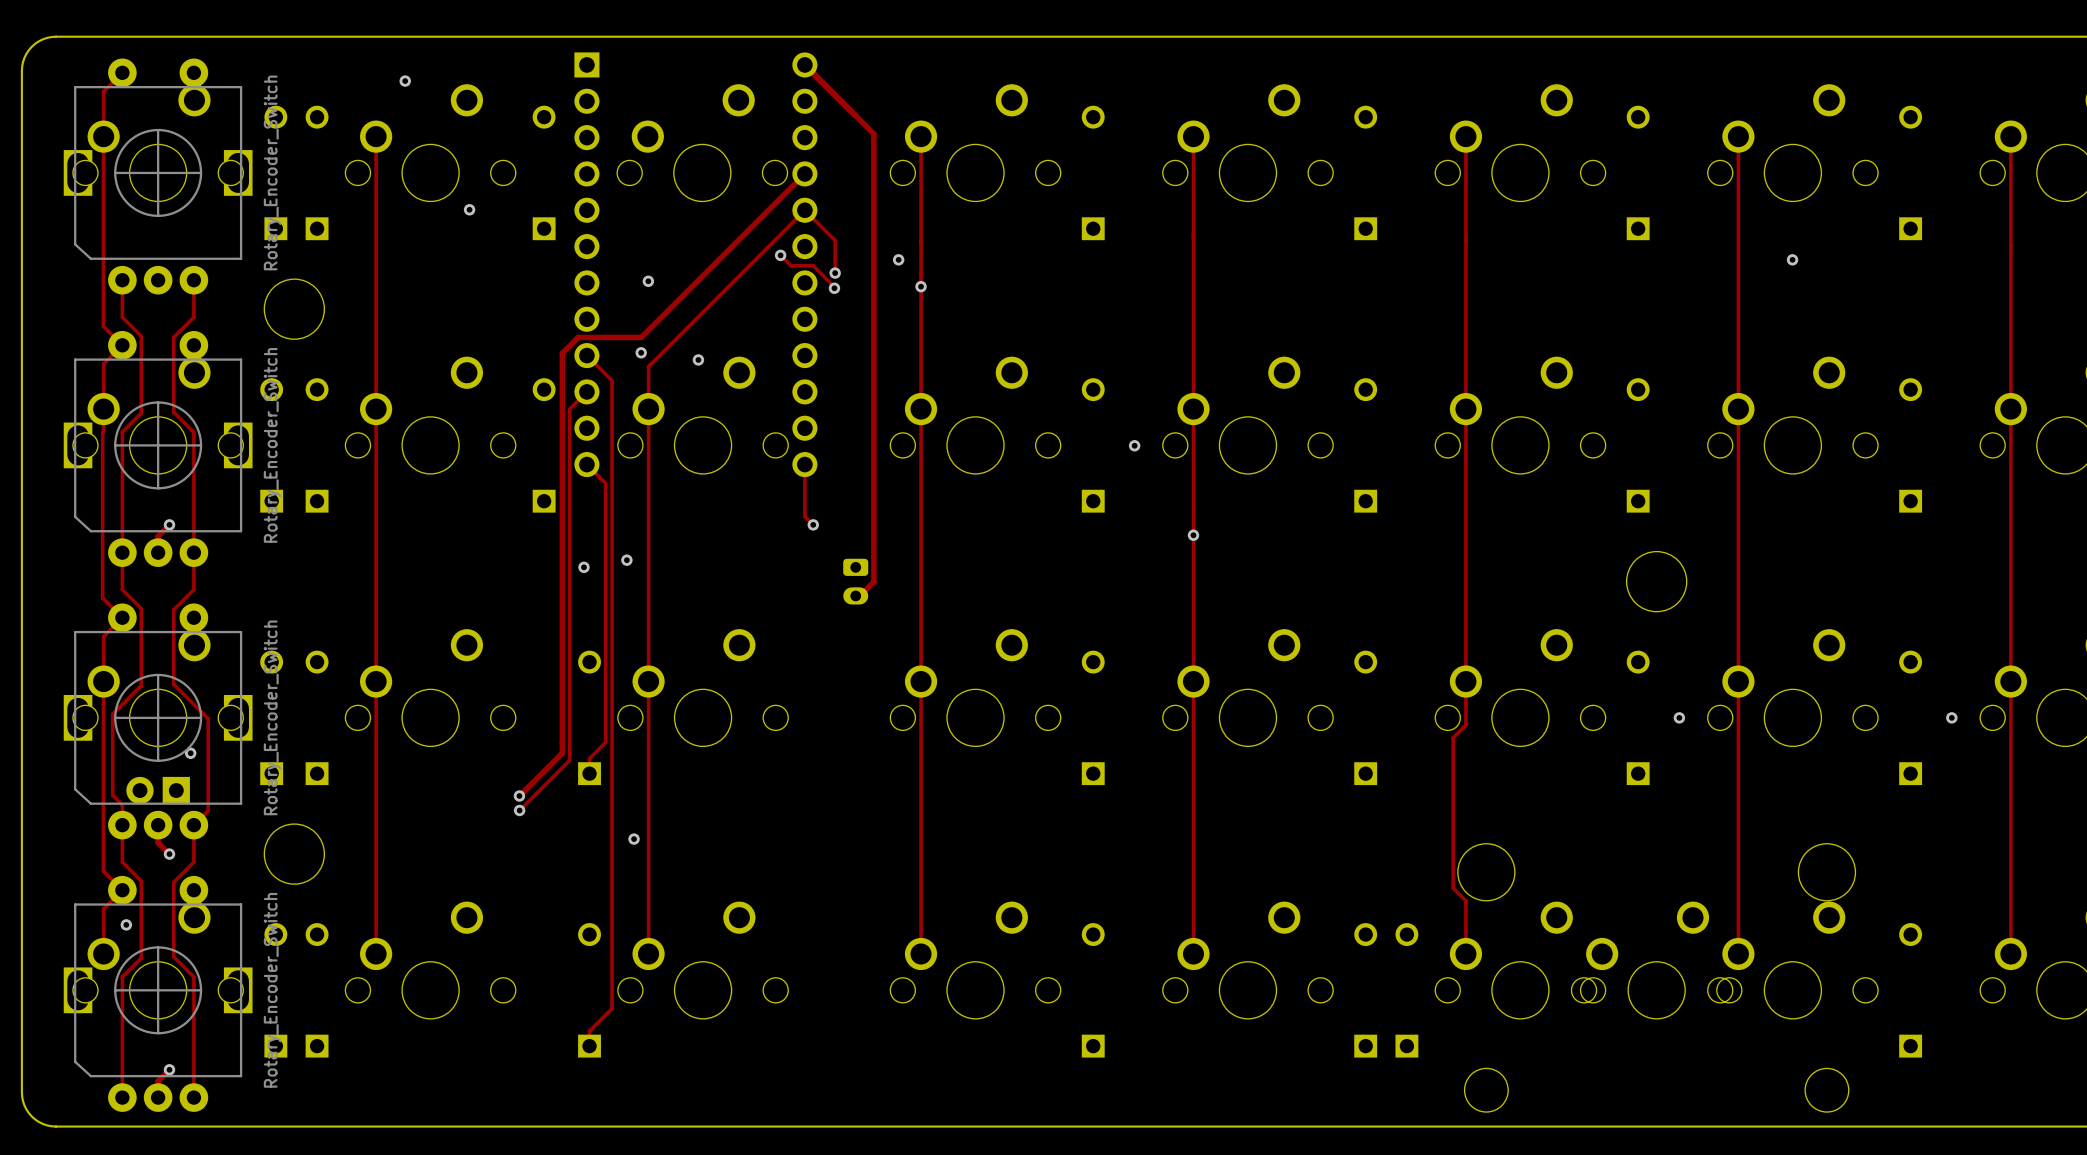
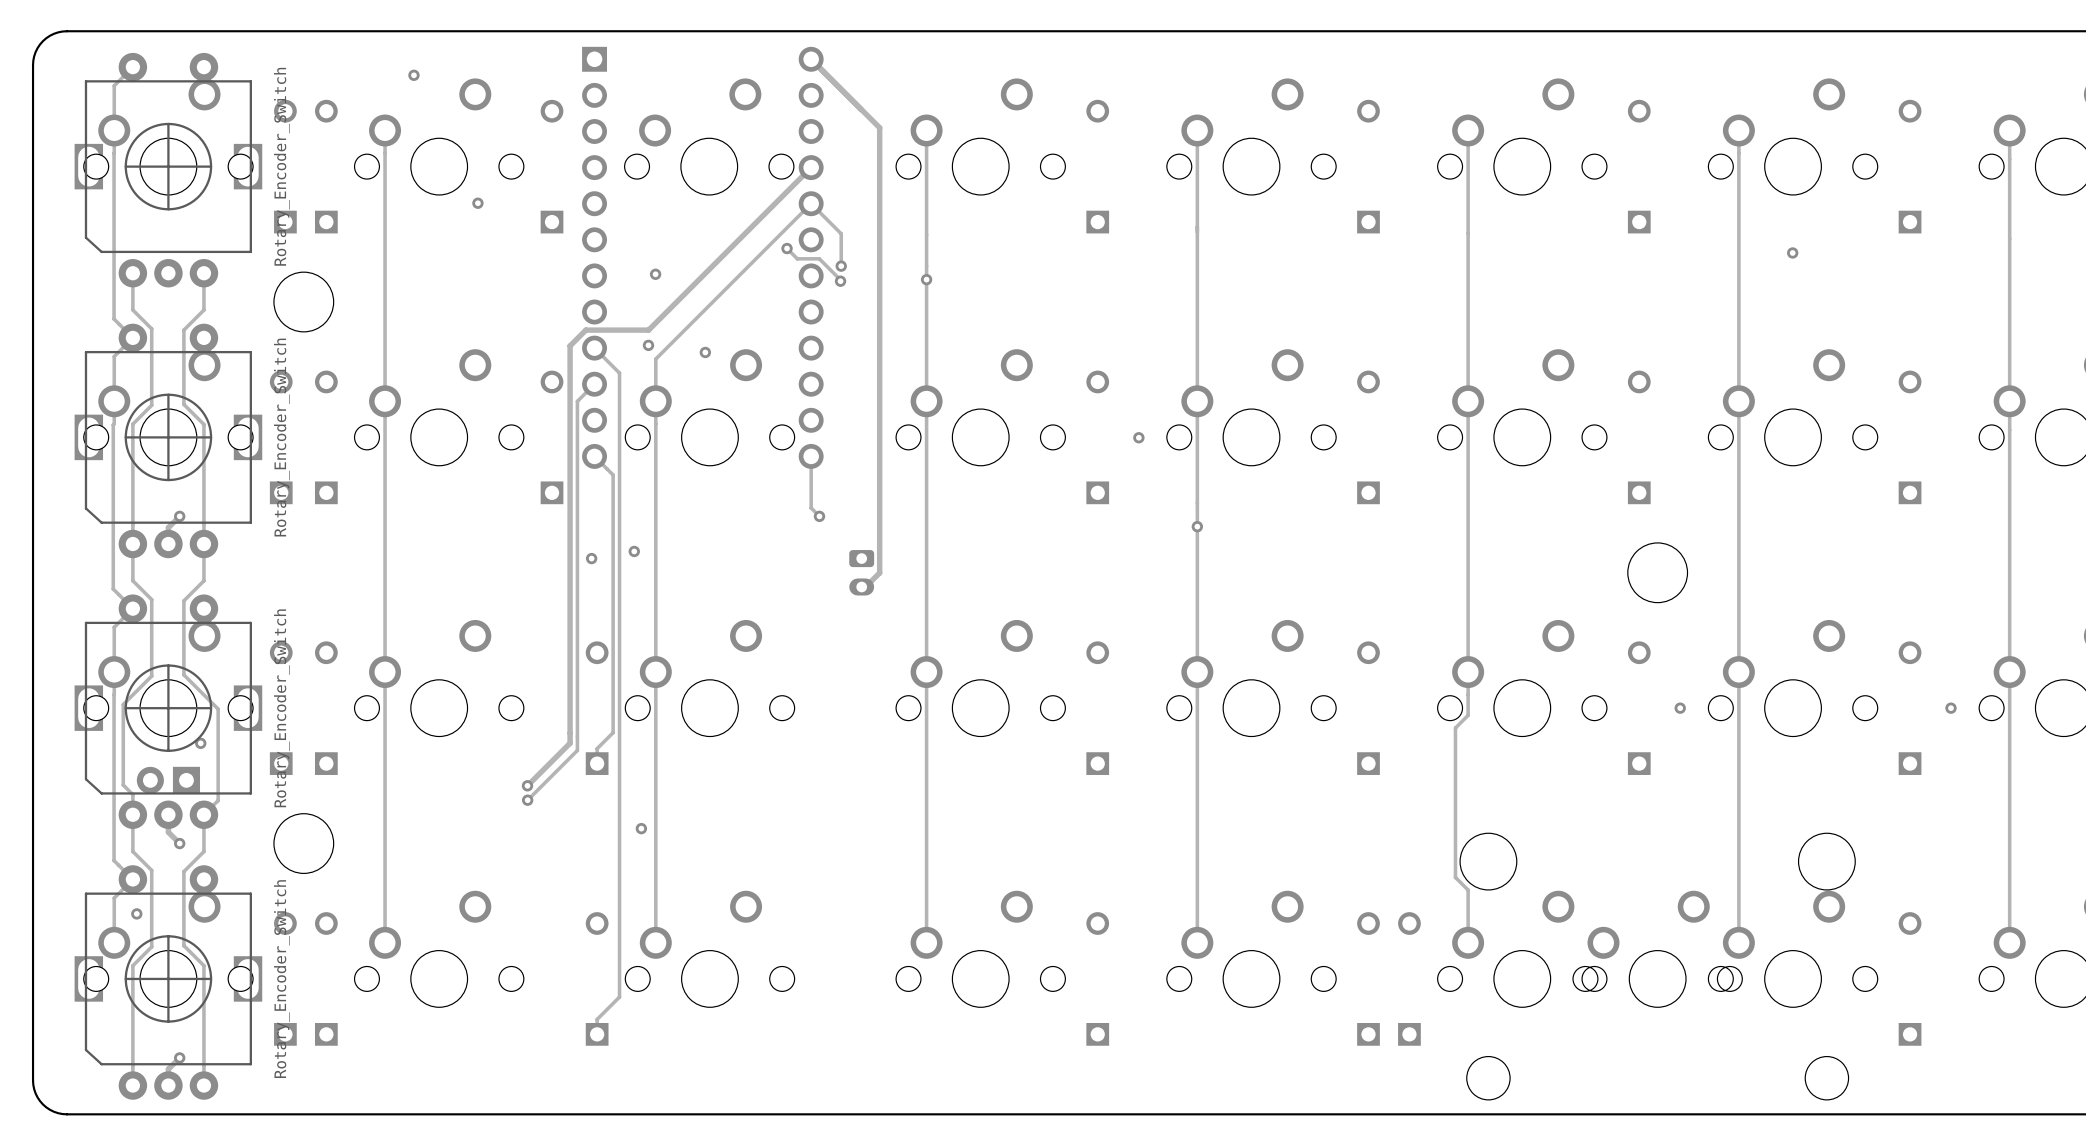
via: (898, 259) -> none

